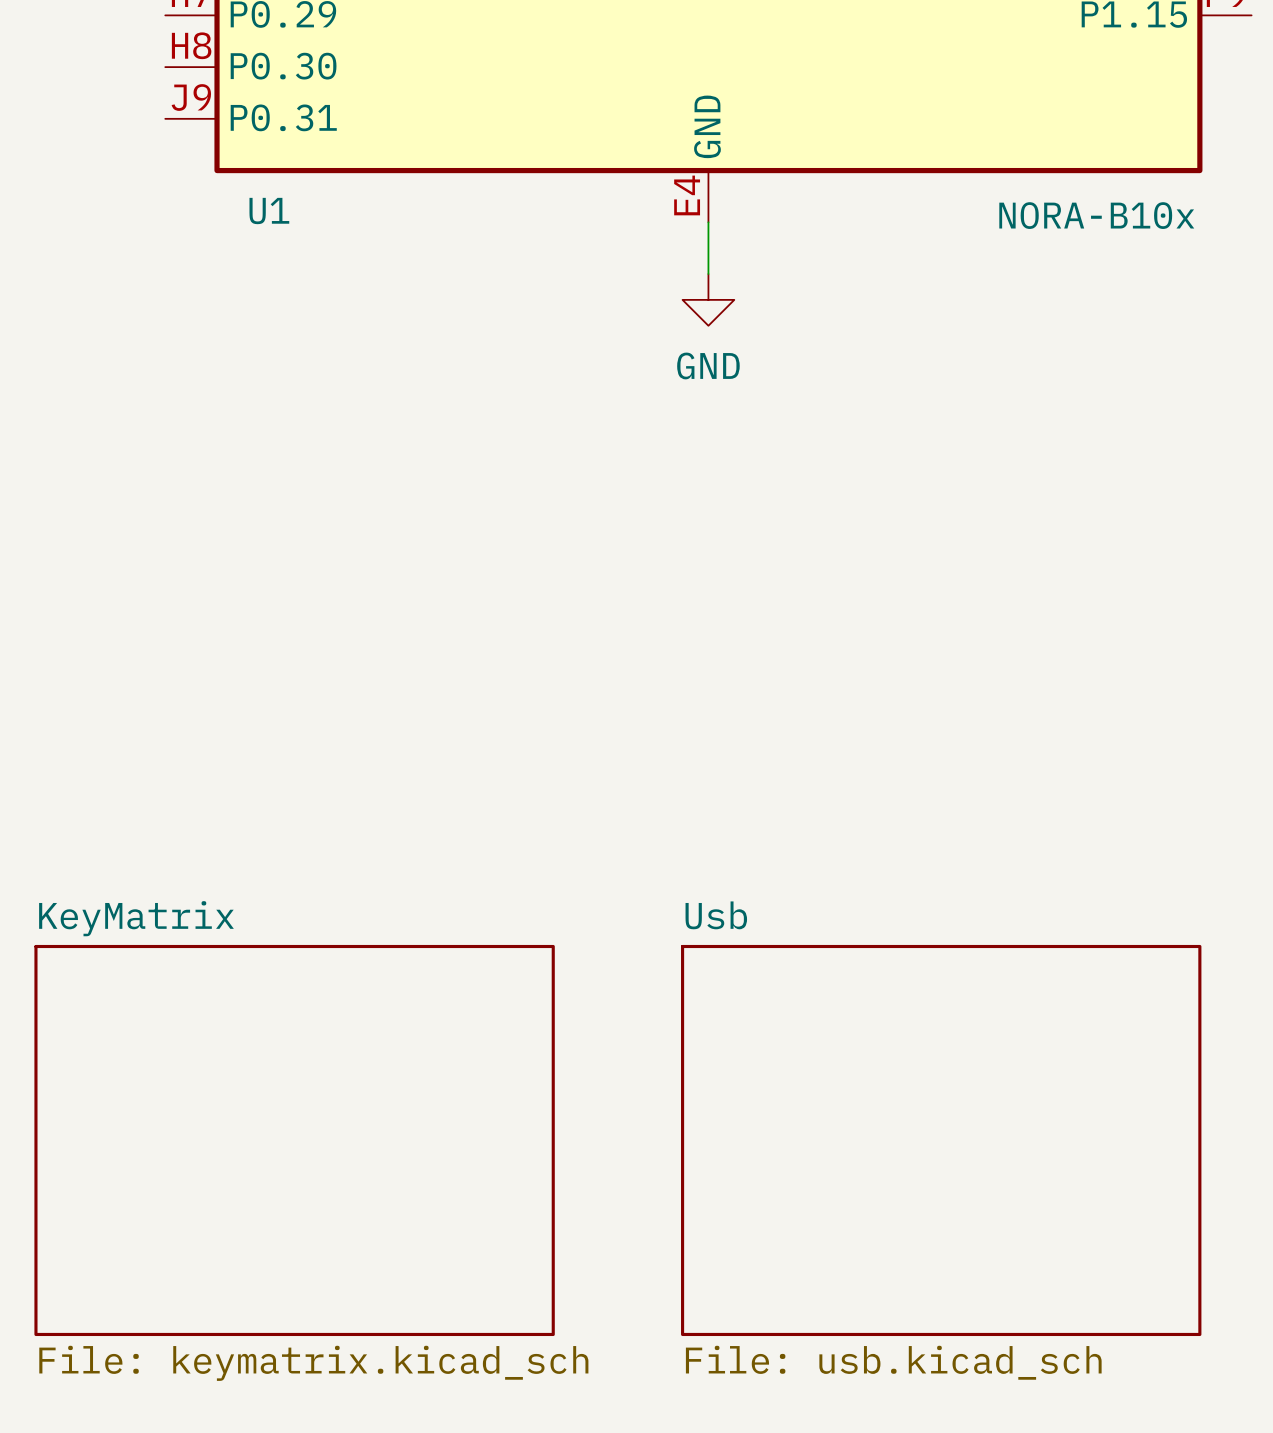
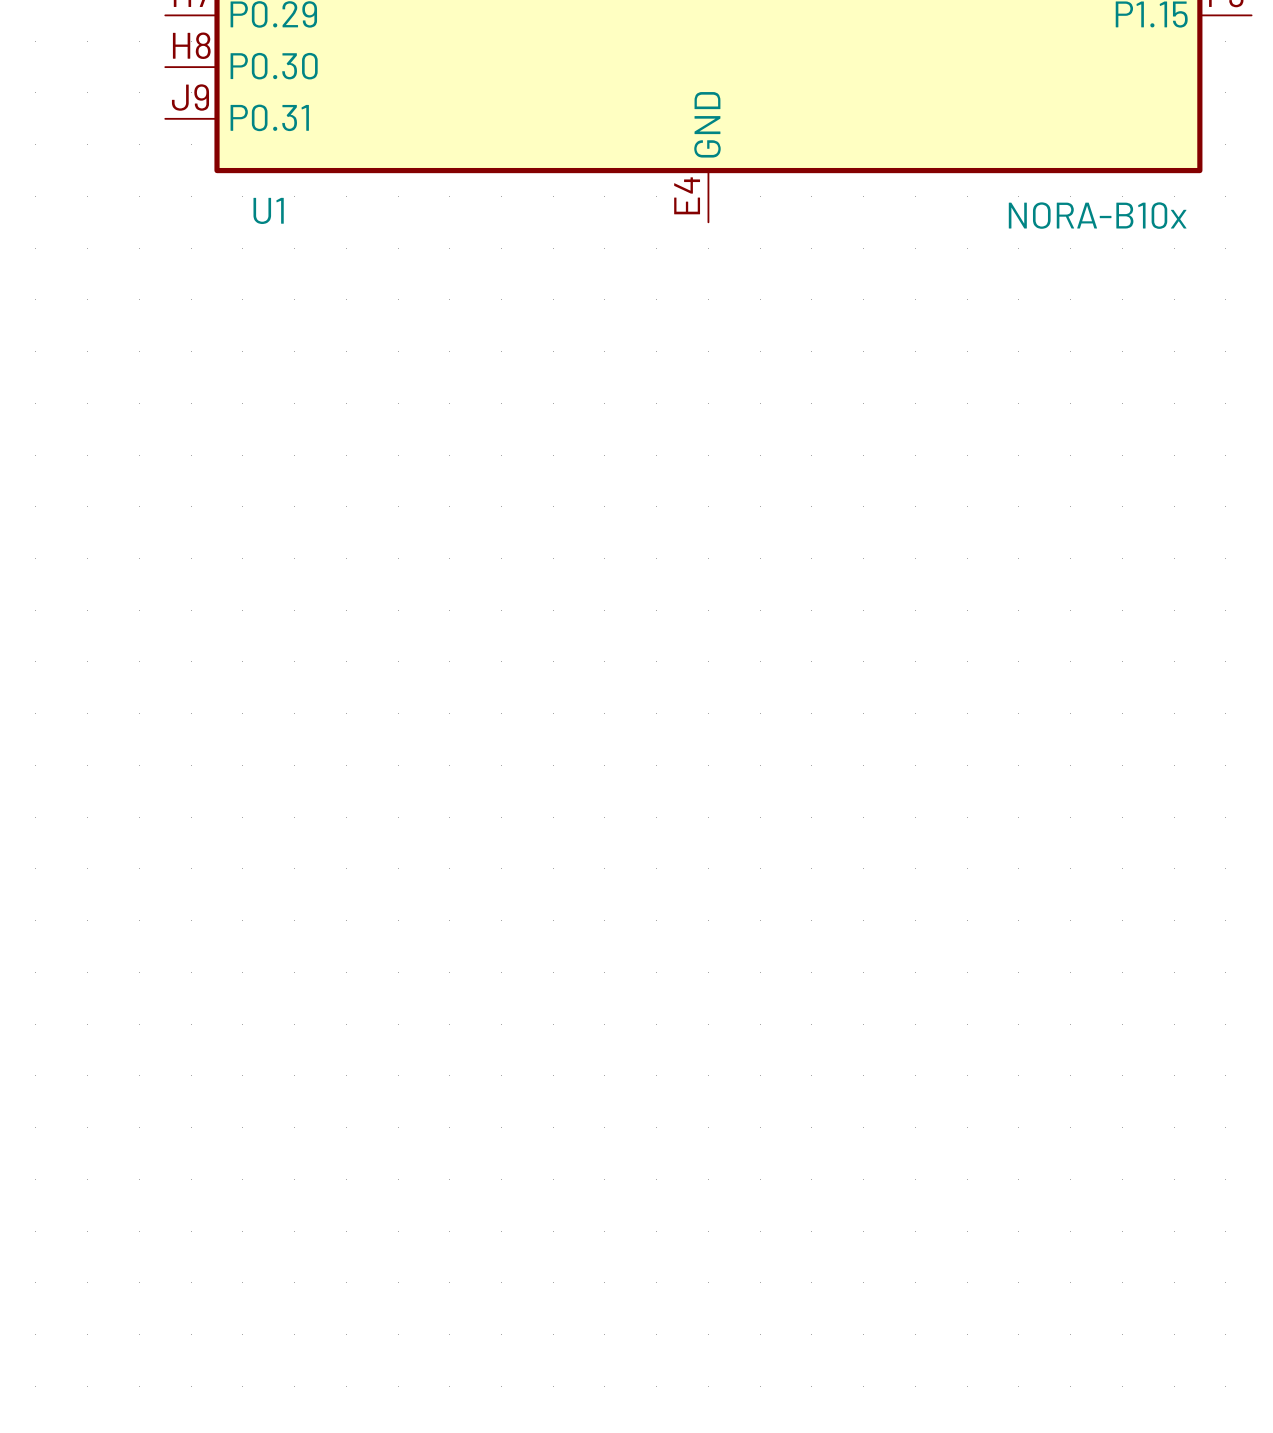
wire: (708, 222) (708, 274) -> none
power symbol: GND (708, 299) -> none
sheet KeyMatrix: File: keymatrix.kicad_sch (294, 1140) -> none
sheet Usb: File: usb.kicad_sch (941, 1140) -> none

